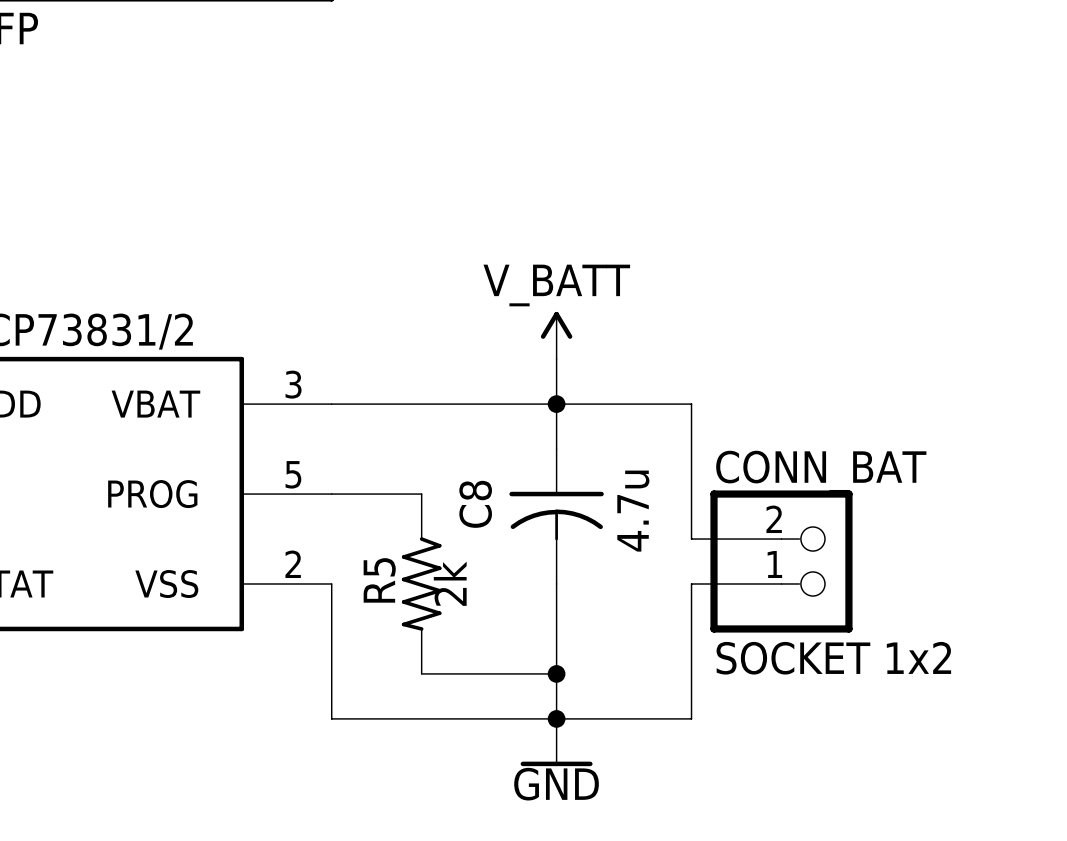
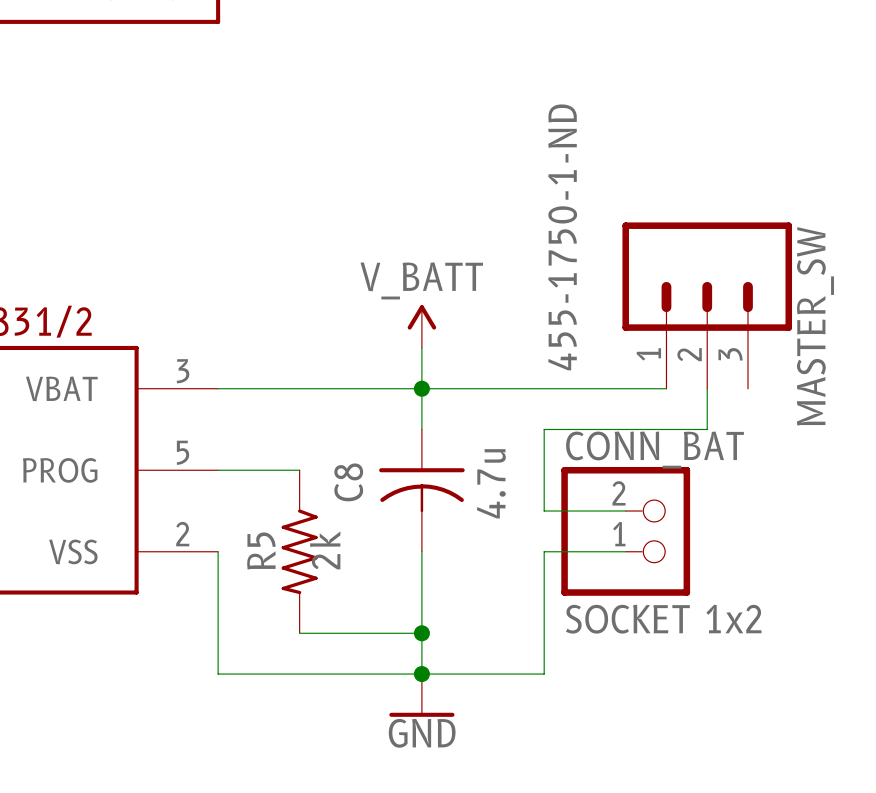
MASTER_SW: none -> 455-1750-1-ND (707, 305)
wire: (691, 404) (691, 449) -> (544, 388) (666, 388)
wire: none -> (707, 388) (707, 429) (544, 429)

